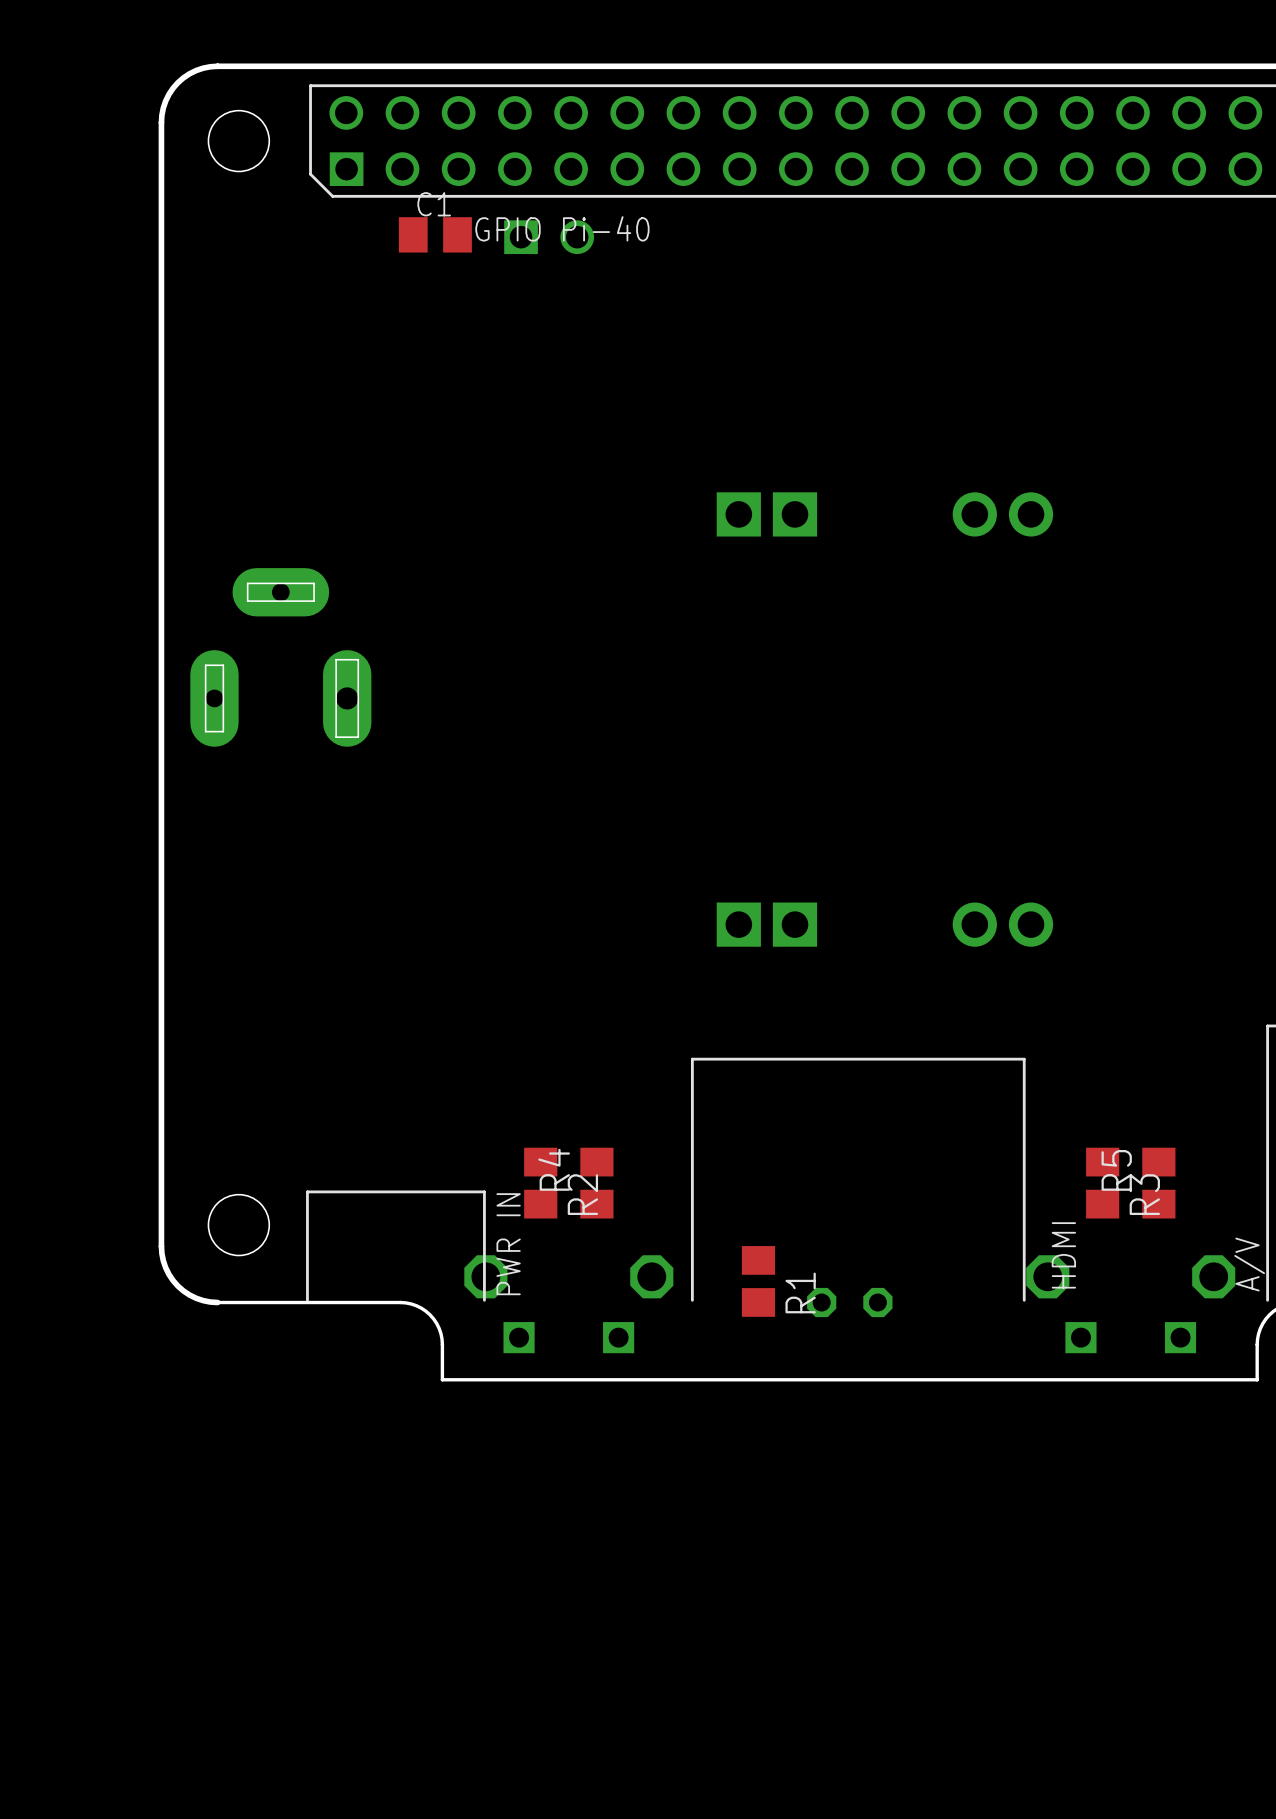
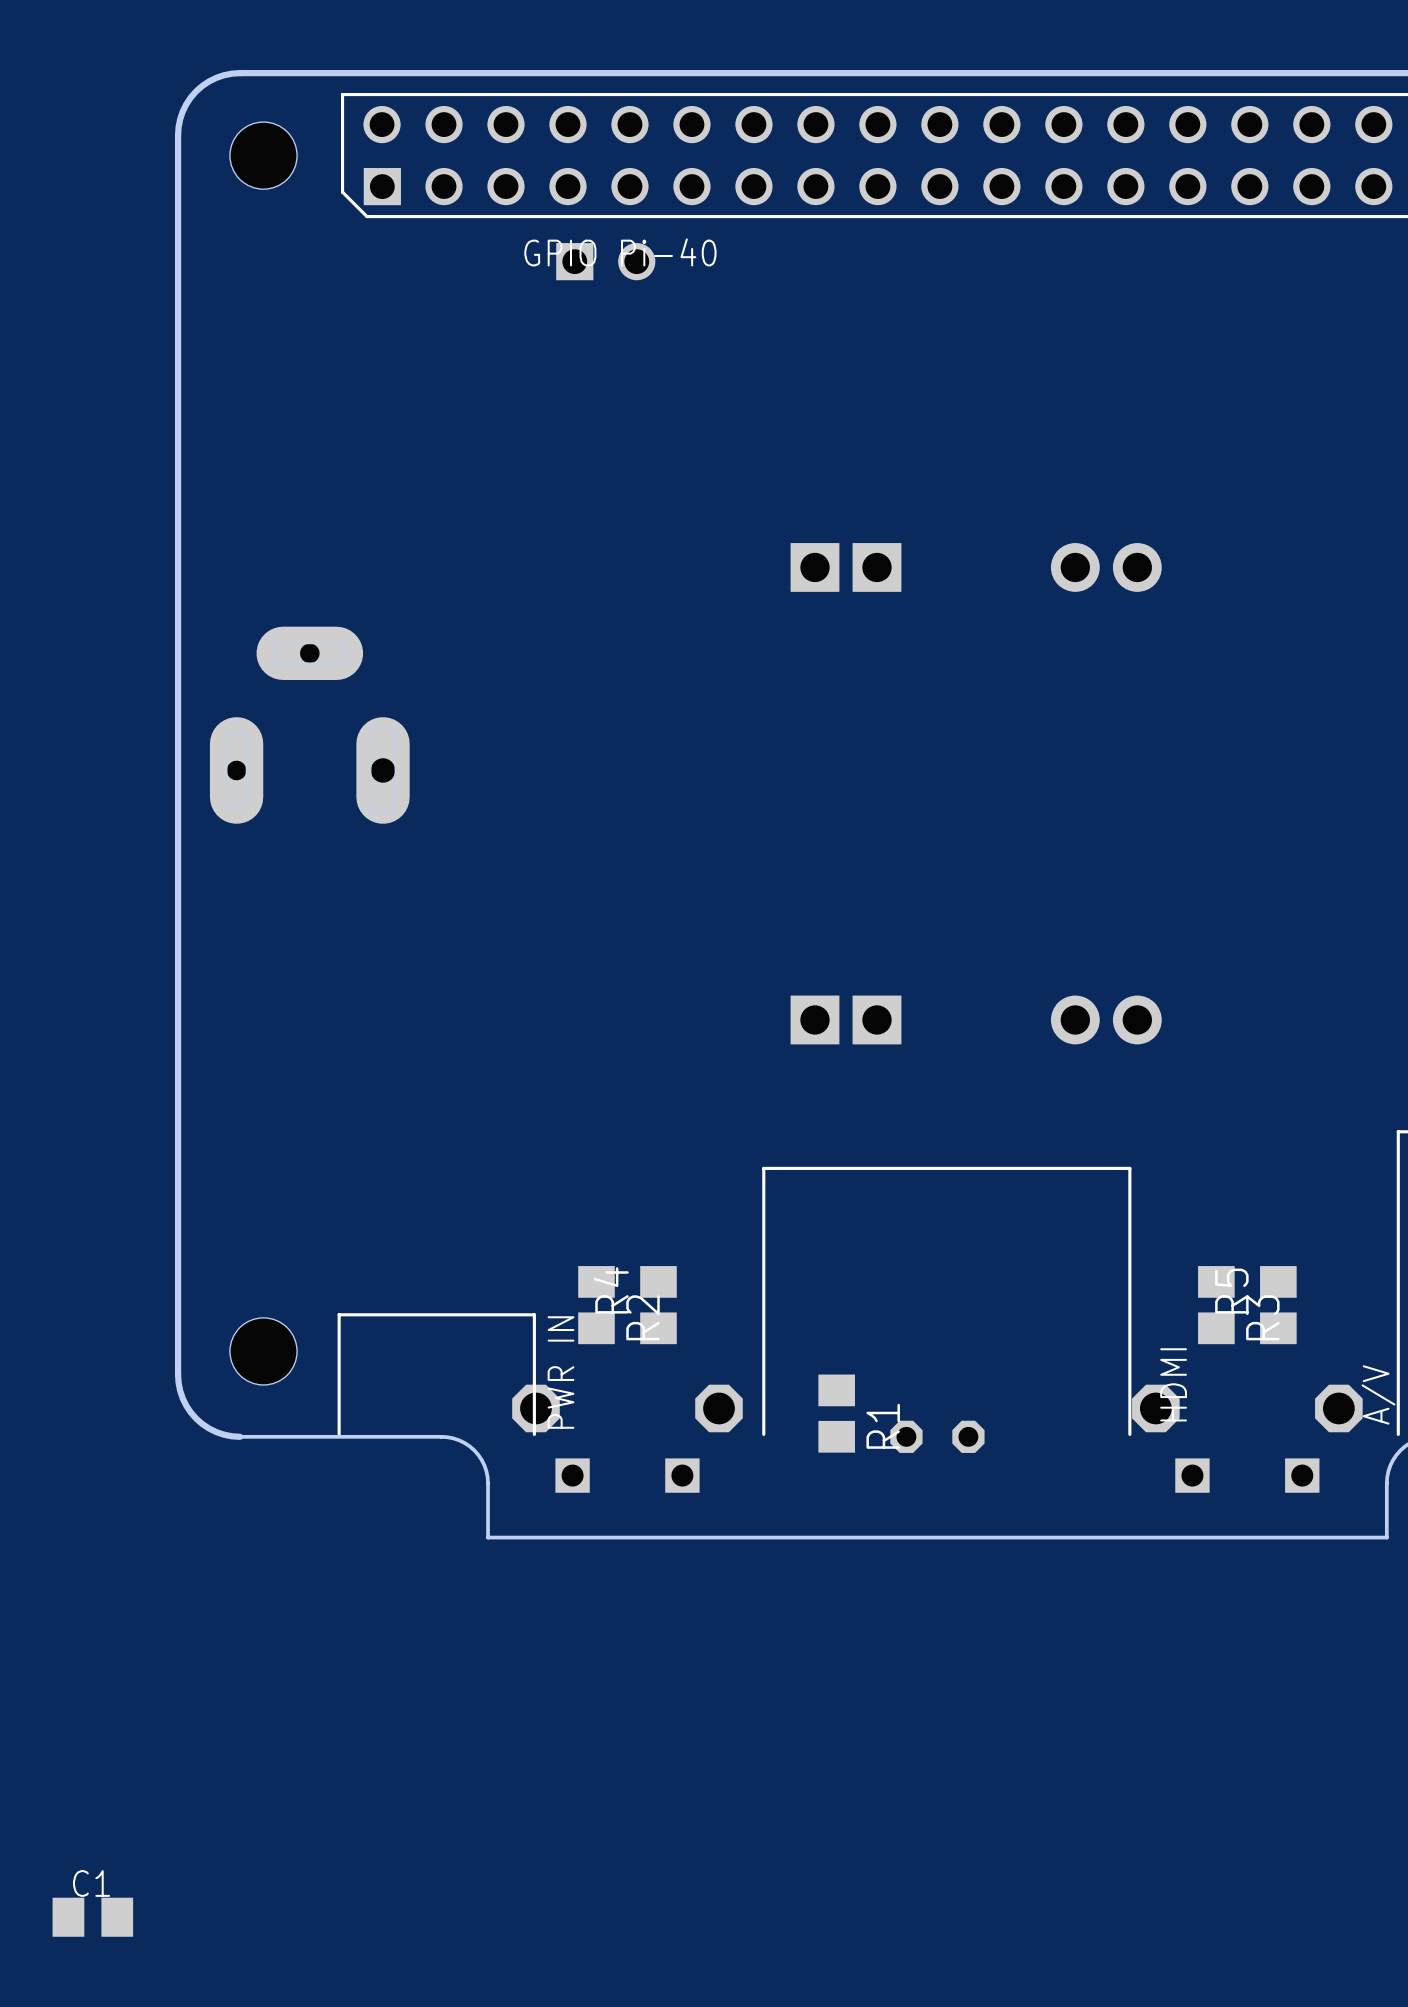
C1 position: (435, 234) -> (92, 1917)
board edge: (442, 1379) (1257, 1379) -> (488, 1522) (488, 1537) (1386, 1537) (1386, 1522)

